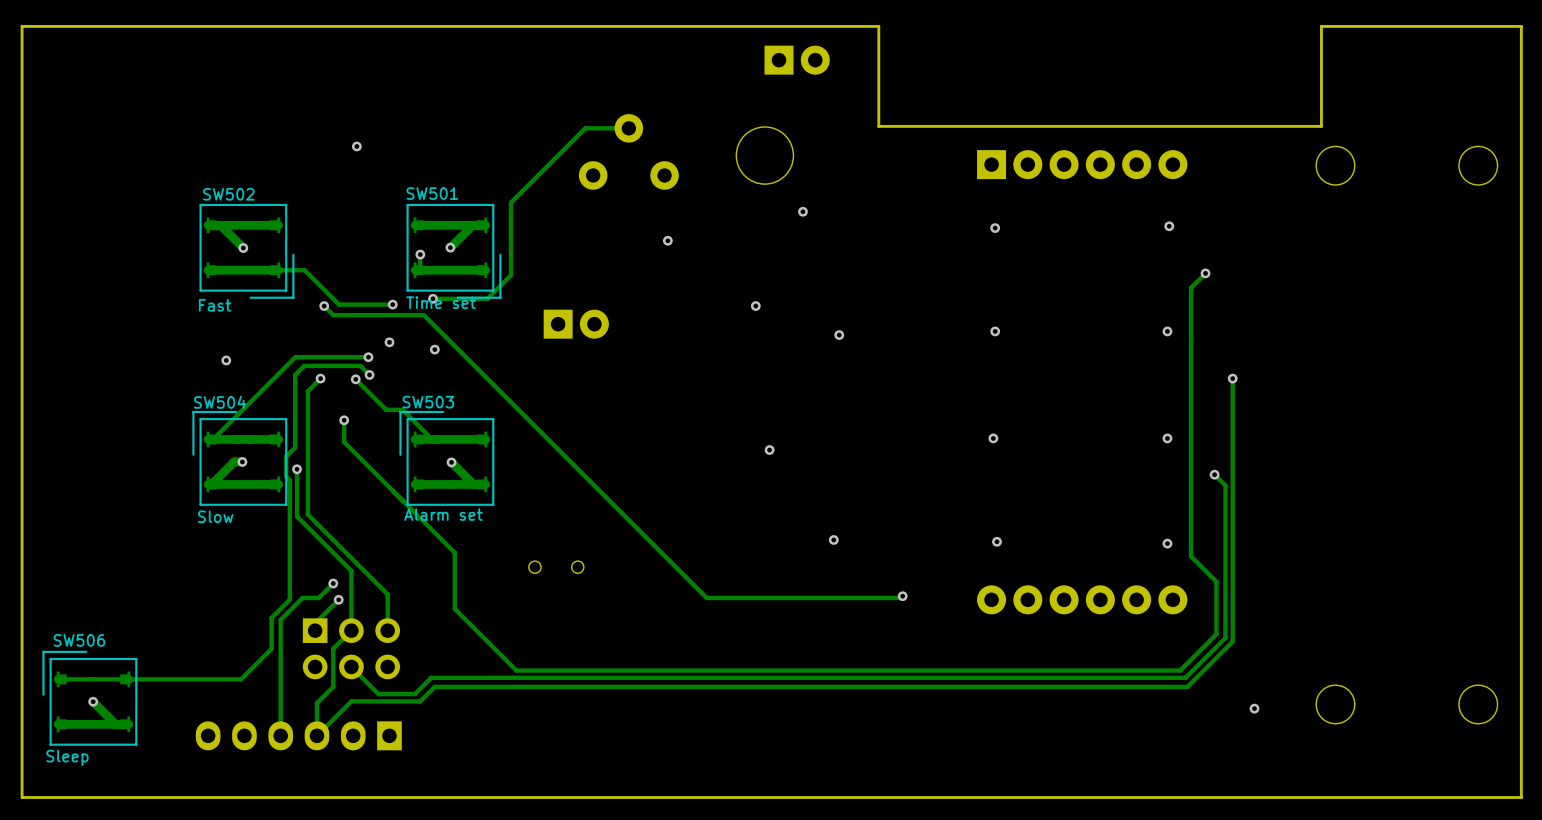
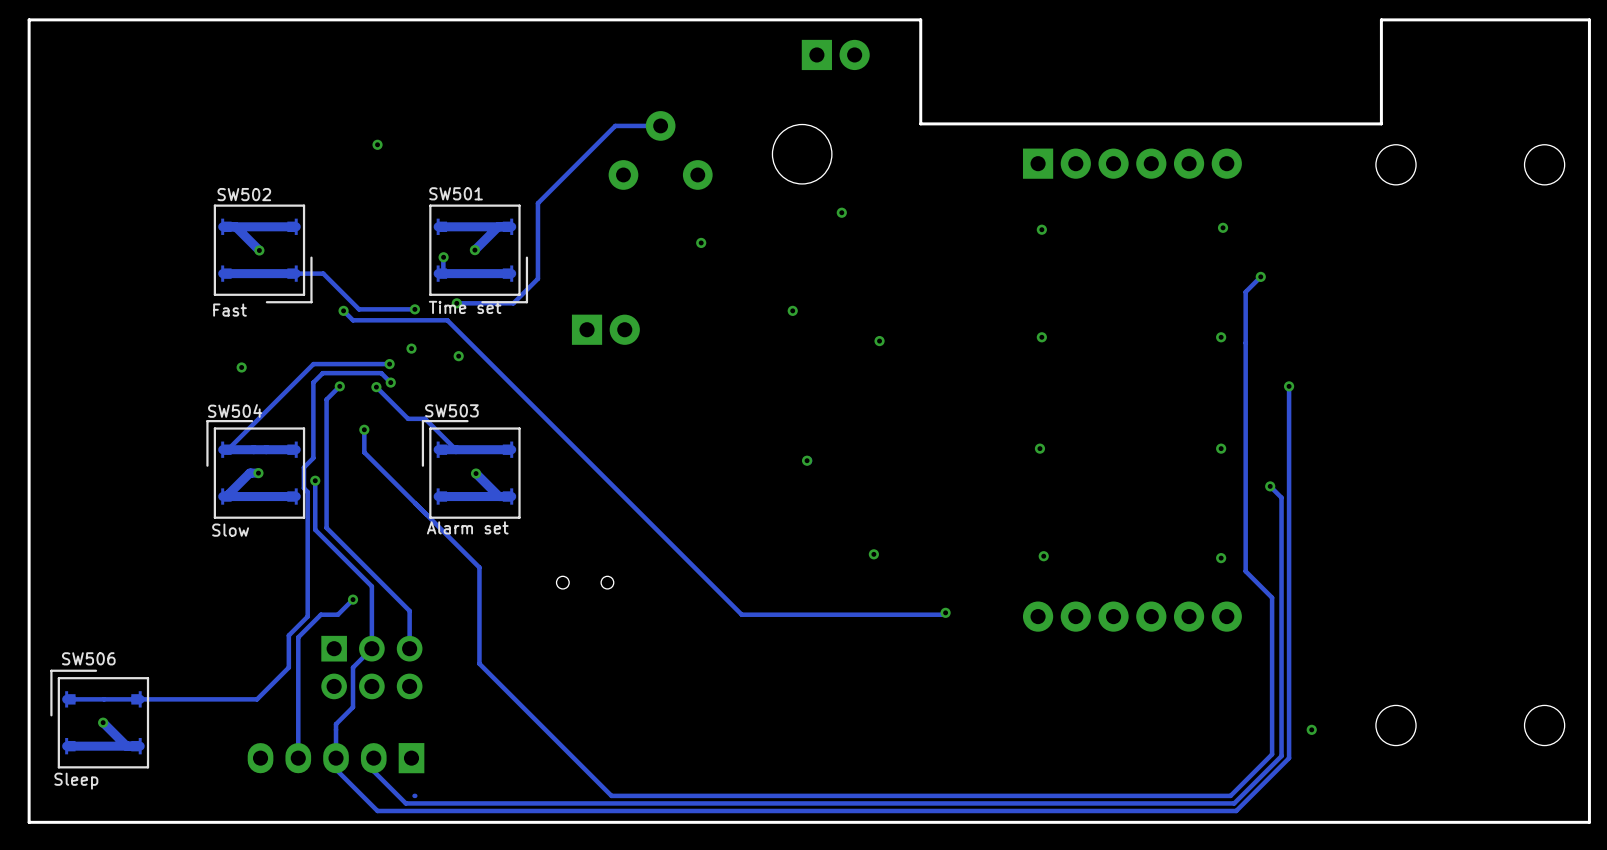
track: (338, 599) (315, 623) (315, 630) -> none
via: (338, 599) -> none
track: (454, 608) (516, 670) (1180, 670) (1216, 634) -> (479, 626) (479, 663) (611, 795) (1230, 795) (1272, 754) (1272, 652)
track: (1225, 637) (1185, 677) (431, 677) (414, 694) (378, 694) (351, 666) -> (1281, 656) (1281, 756) (1234, 803) (405, 803) (373, 771)
track: (1232, 641) (1187, 686) (434, 686) (420, 701) (351, 701) (316, 735) -> (1289, 660) (1289, 758) (1236, 810) (377, 810) (336, 769) (336, 758)
part: (298, 735) -> none
part: none -> (336, 758)
track: none -> (415, 795) (414, 795)

